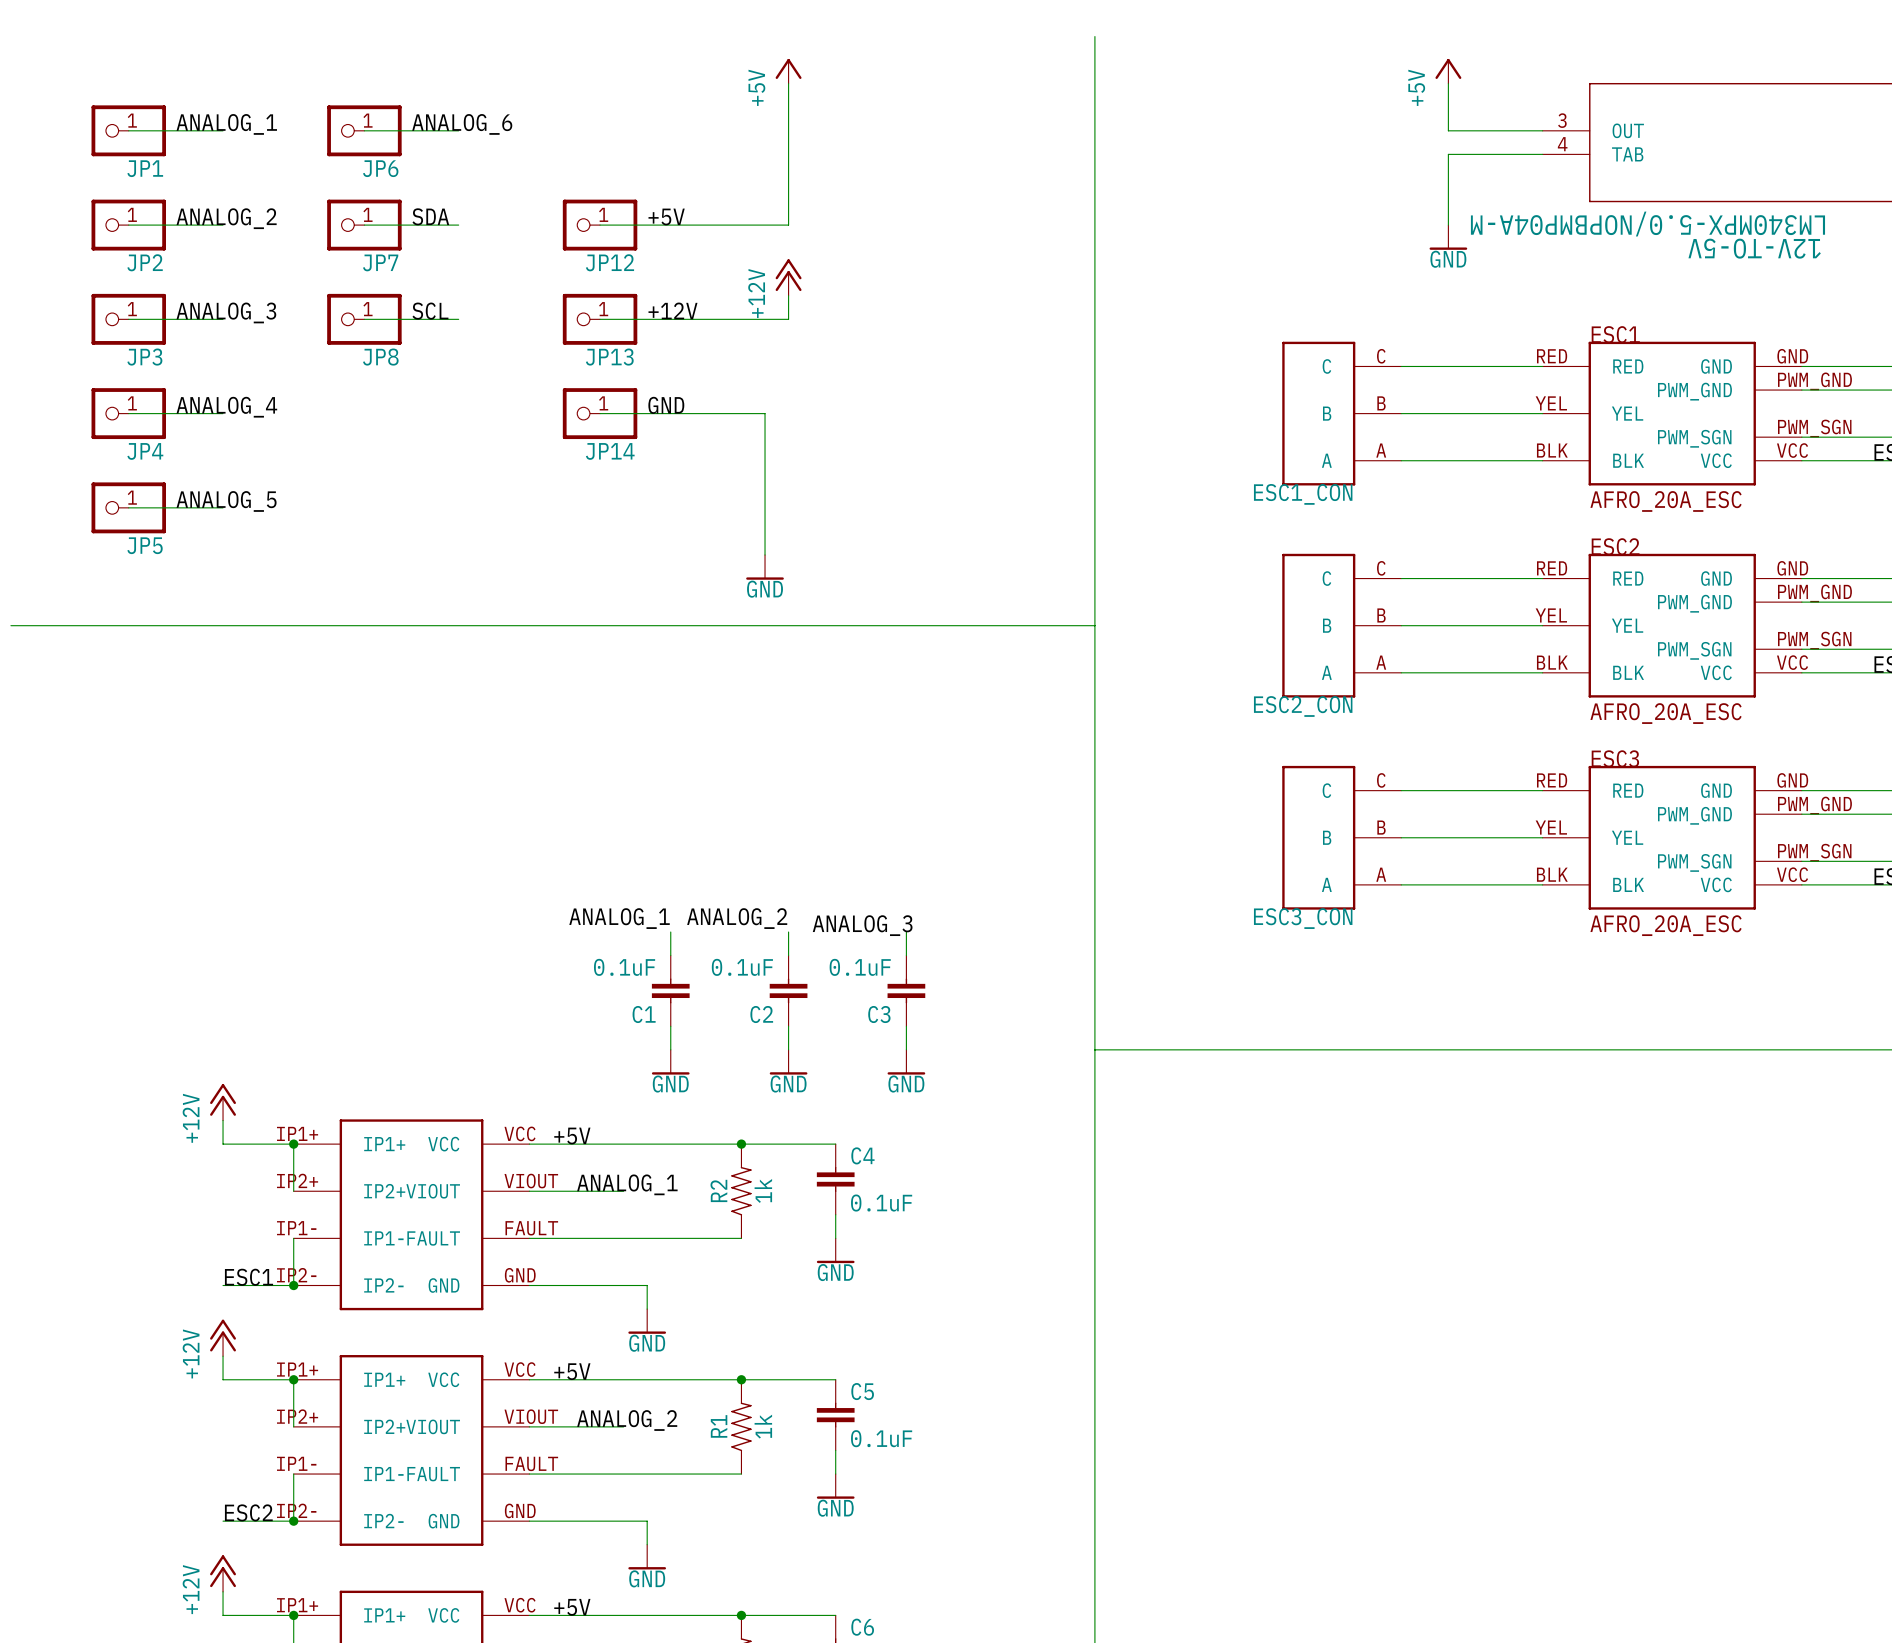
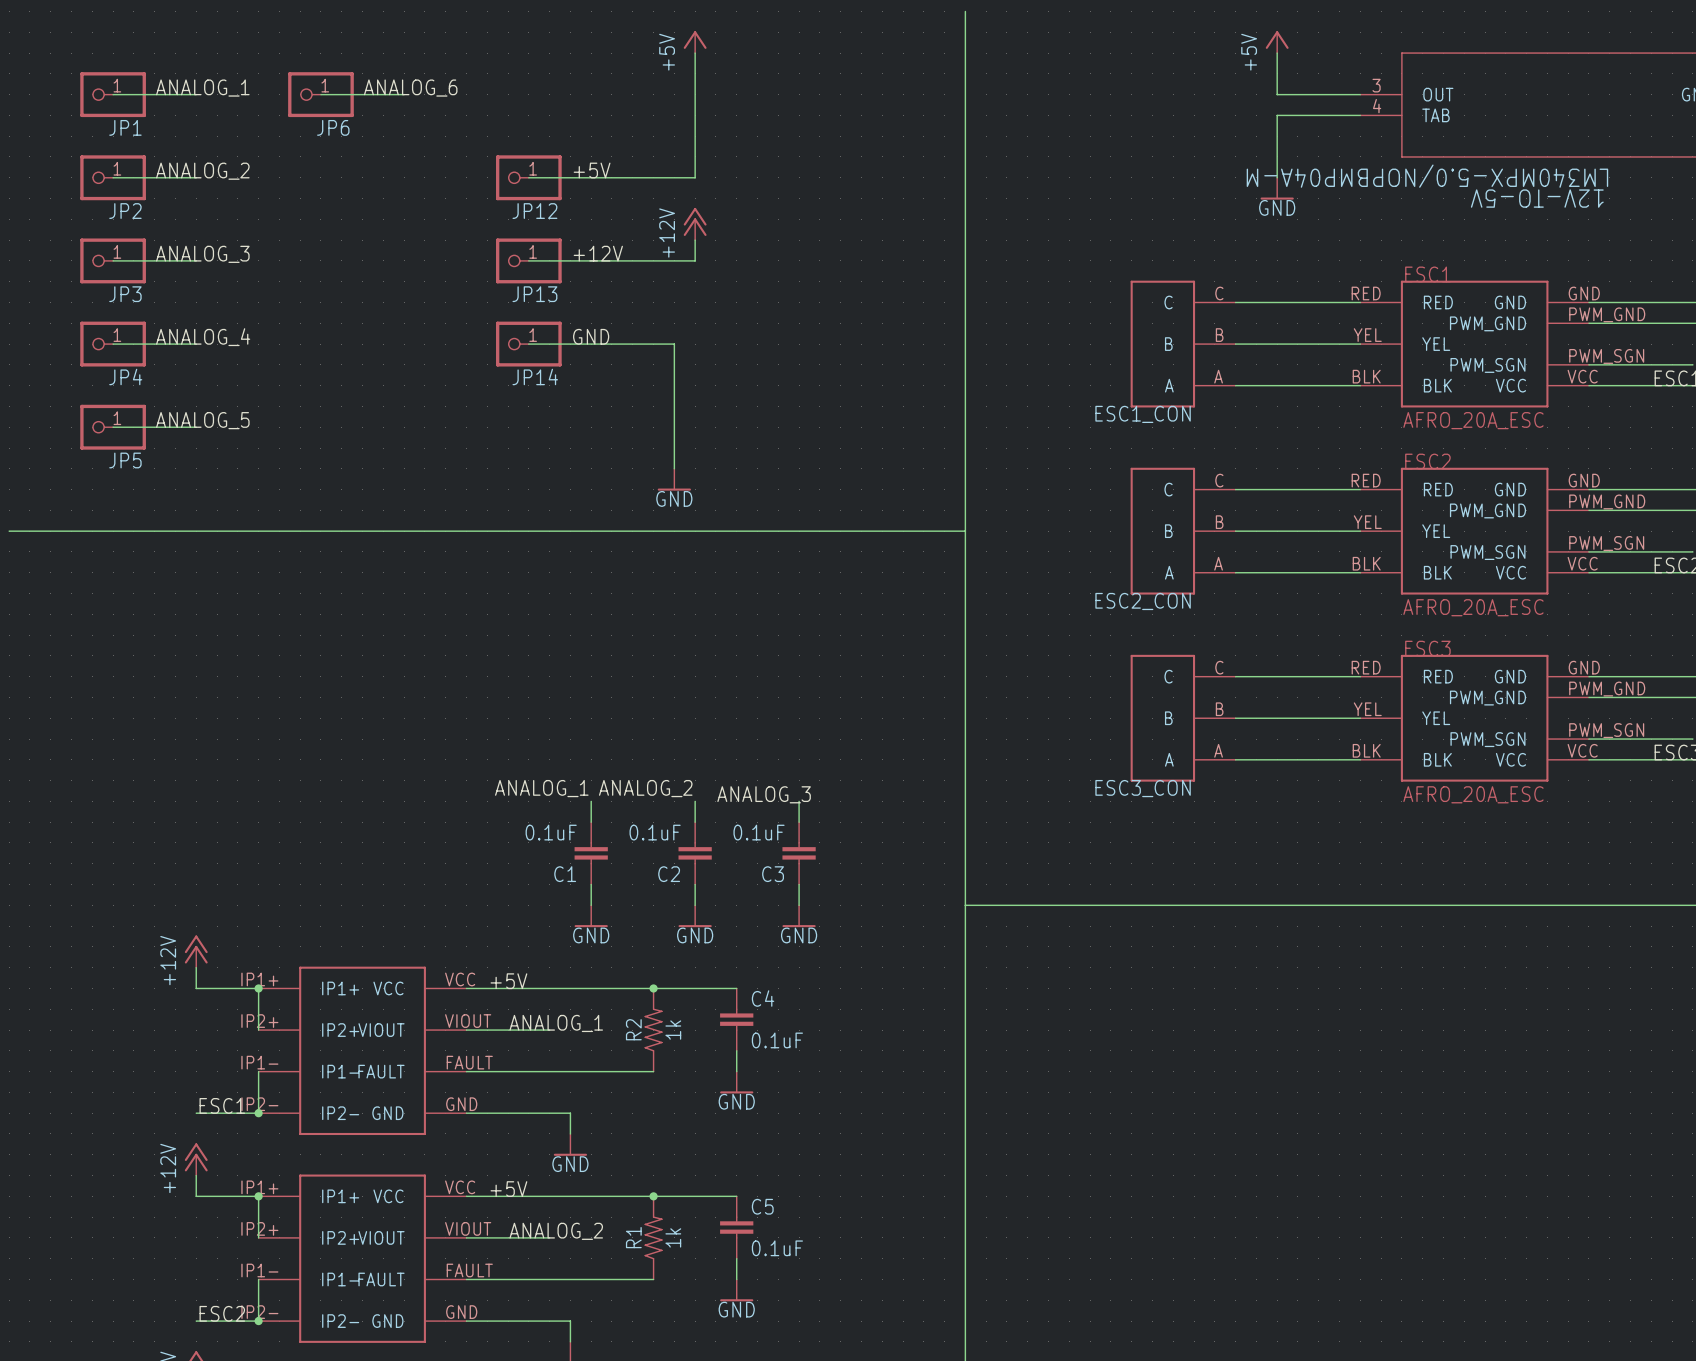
label: SDA (430, 216) -> none
wire: (364, 225) (458, 225) -> none
JP7: (364, 225) -> none
label: SCL (430, 311) -> none
wire: (364, 319) (458, 319) -> none
JP8: (364, 319) -> none

